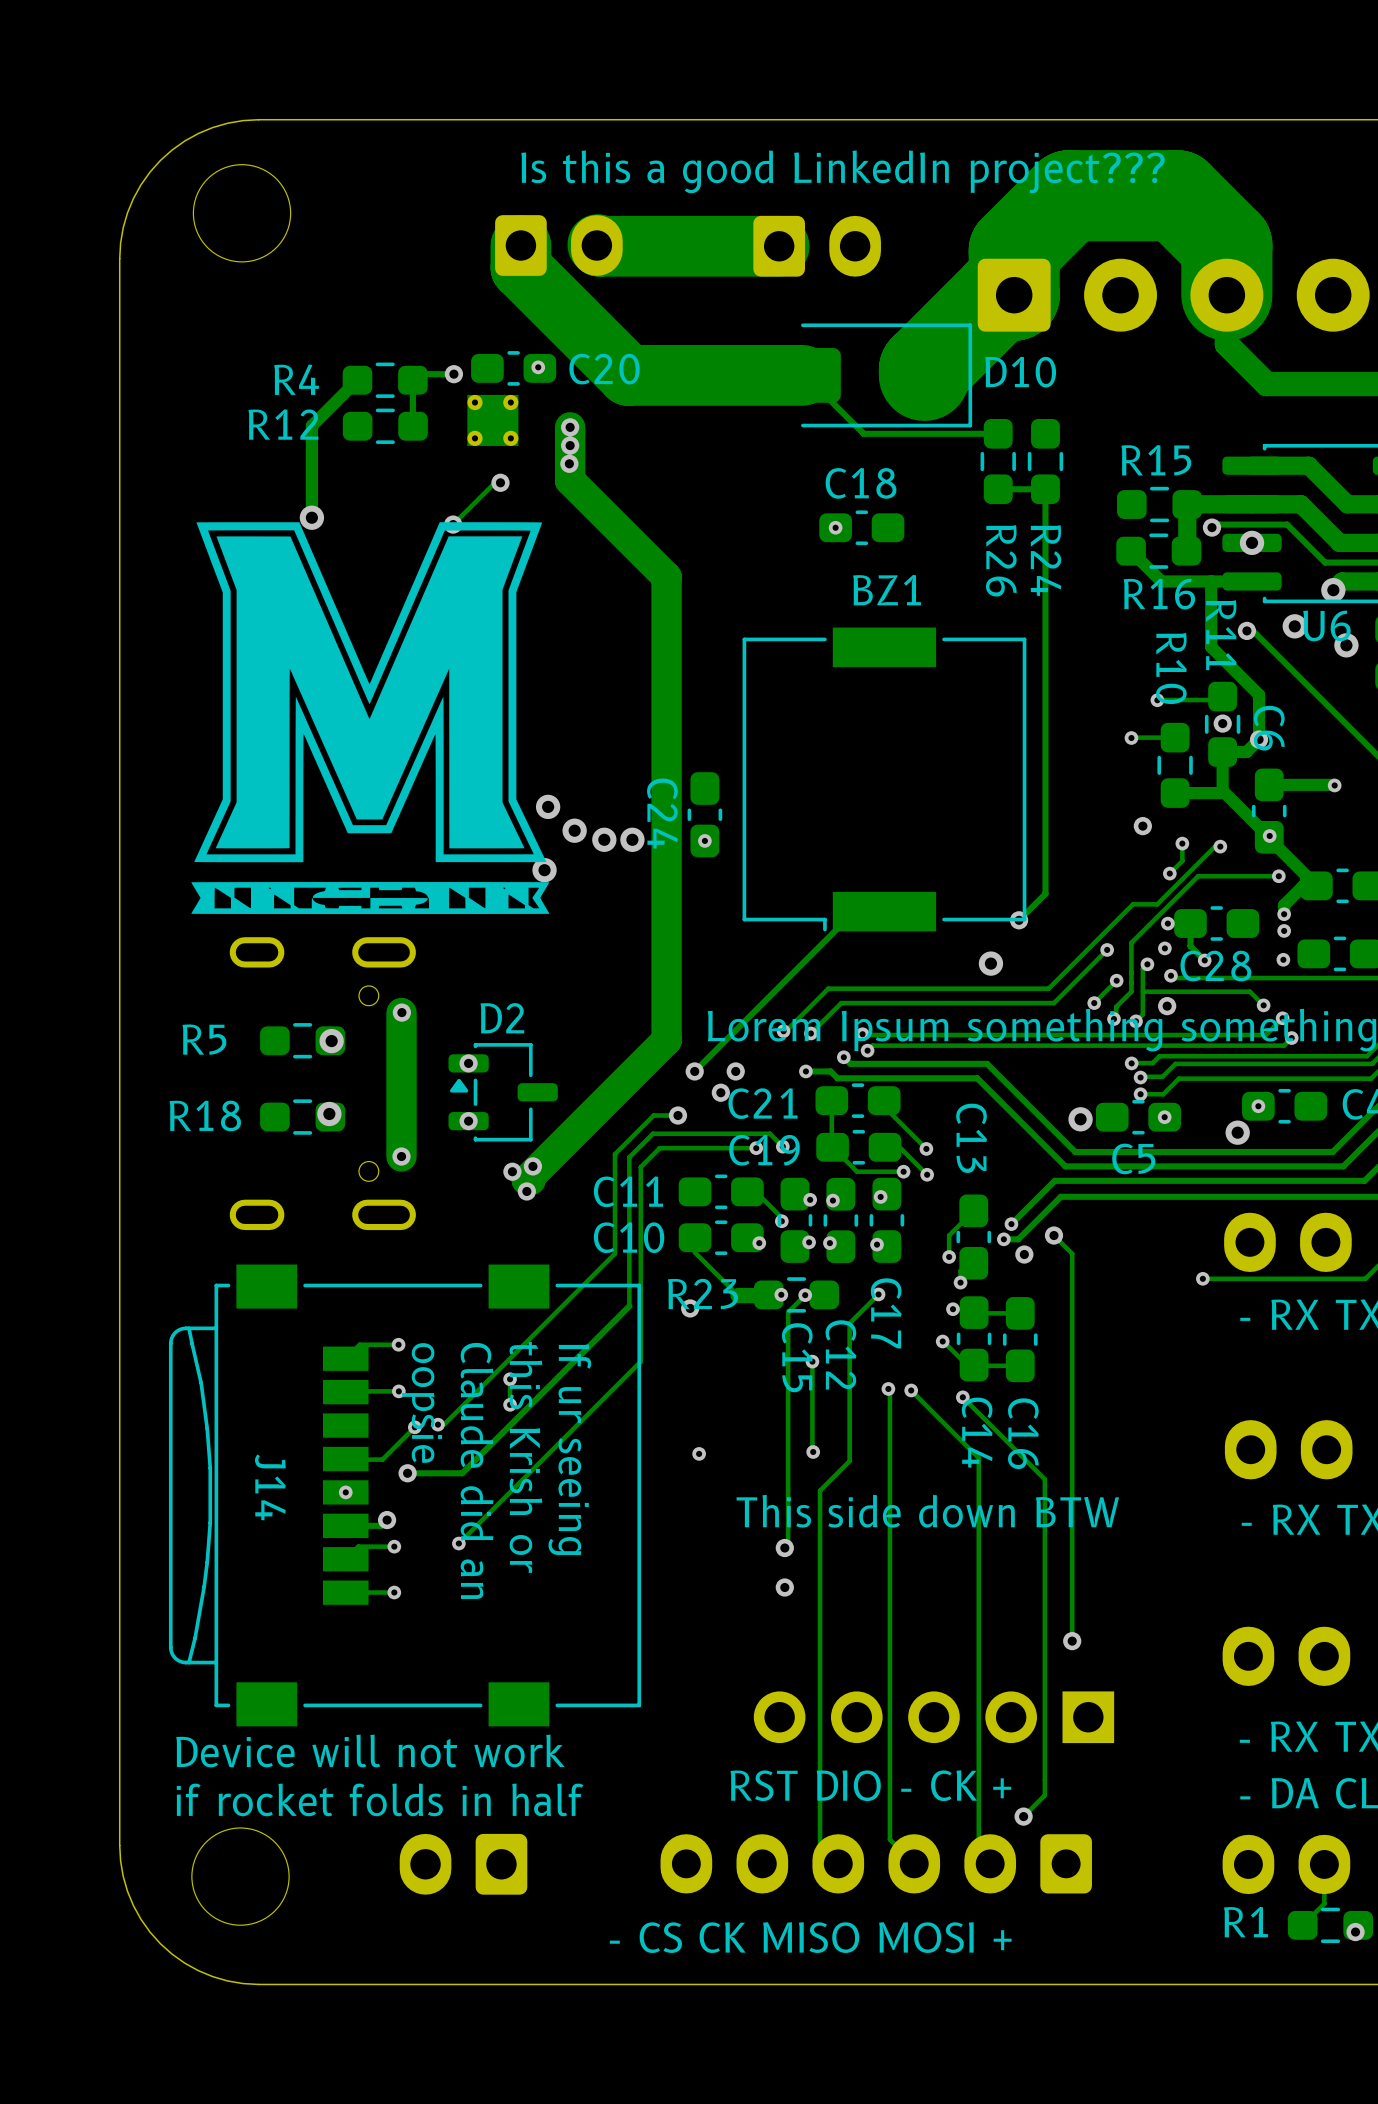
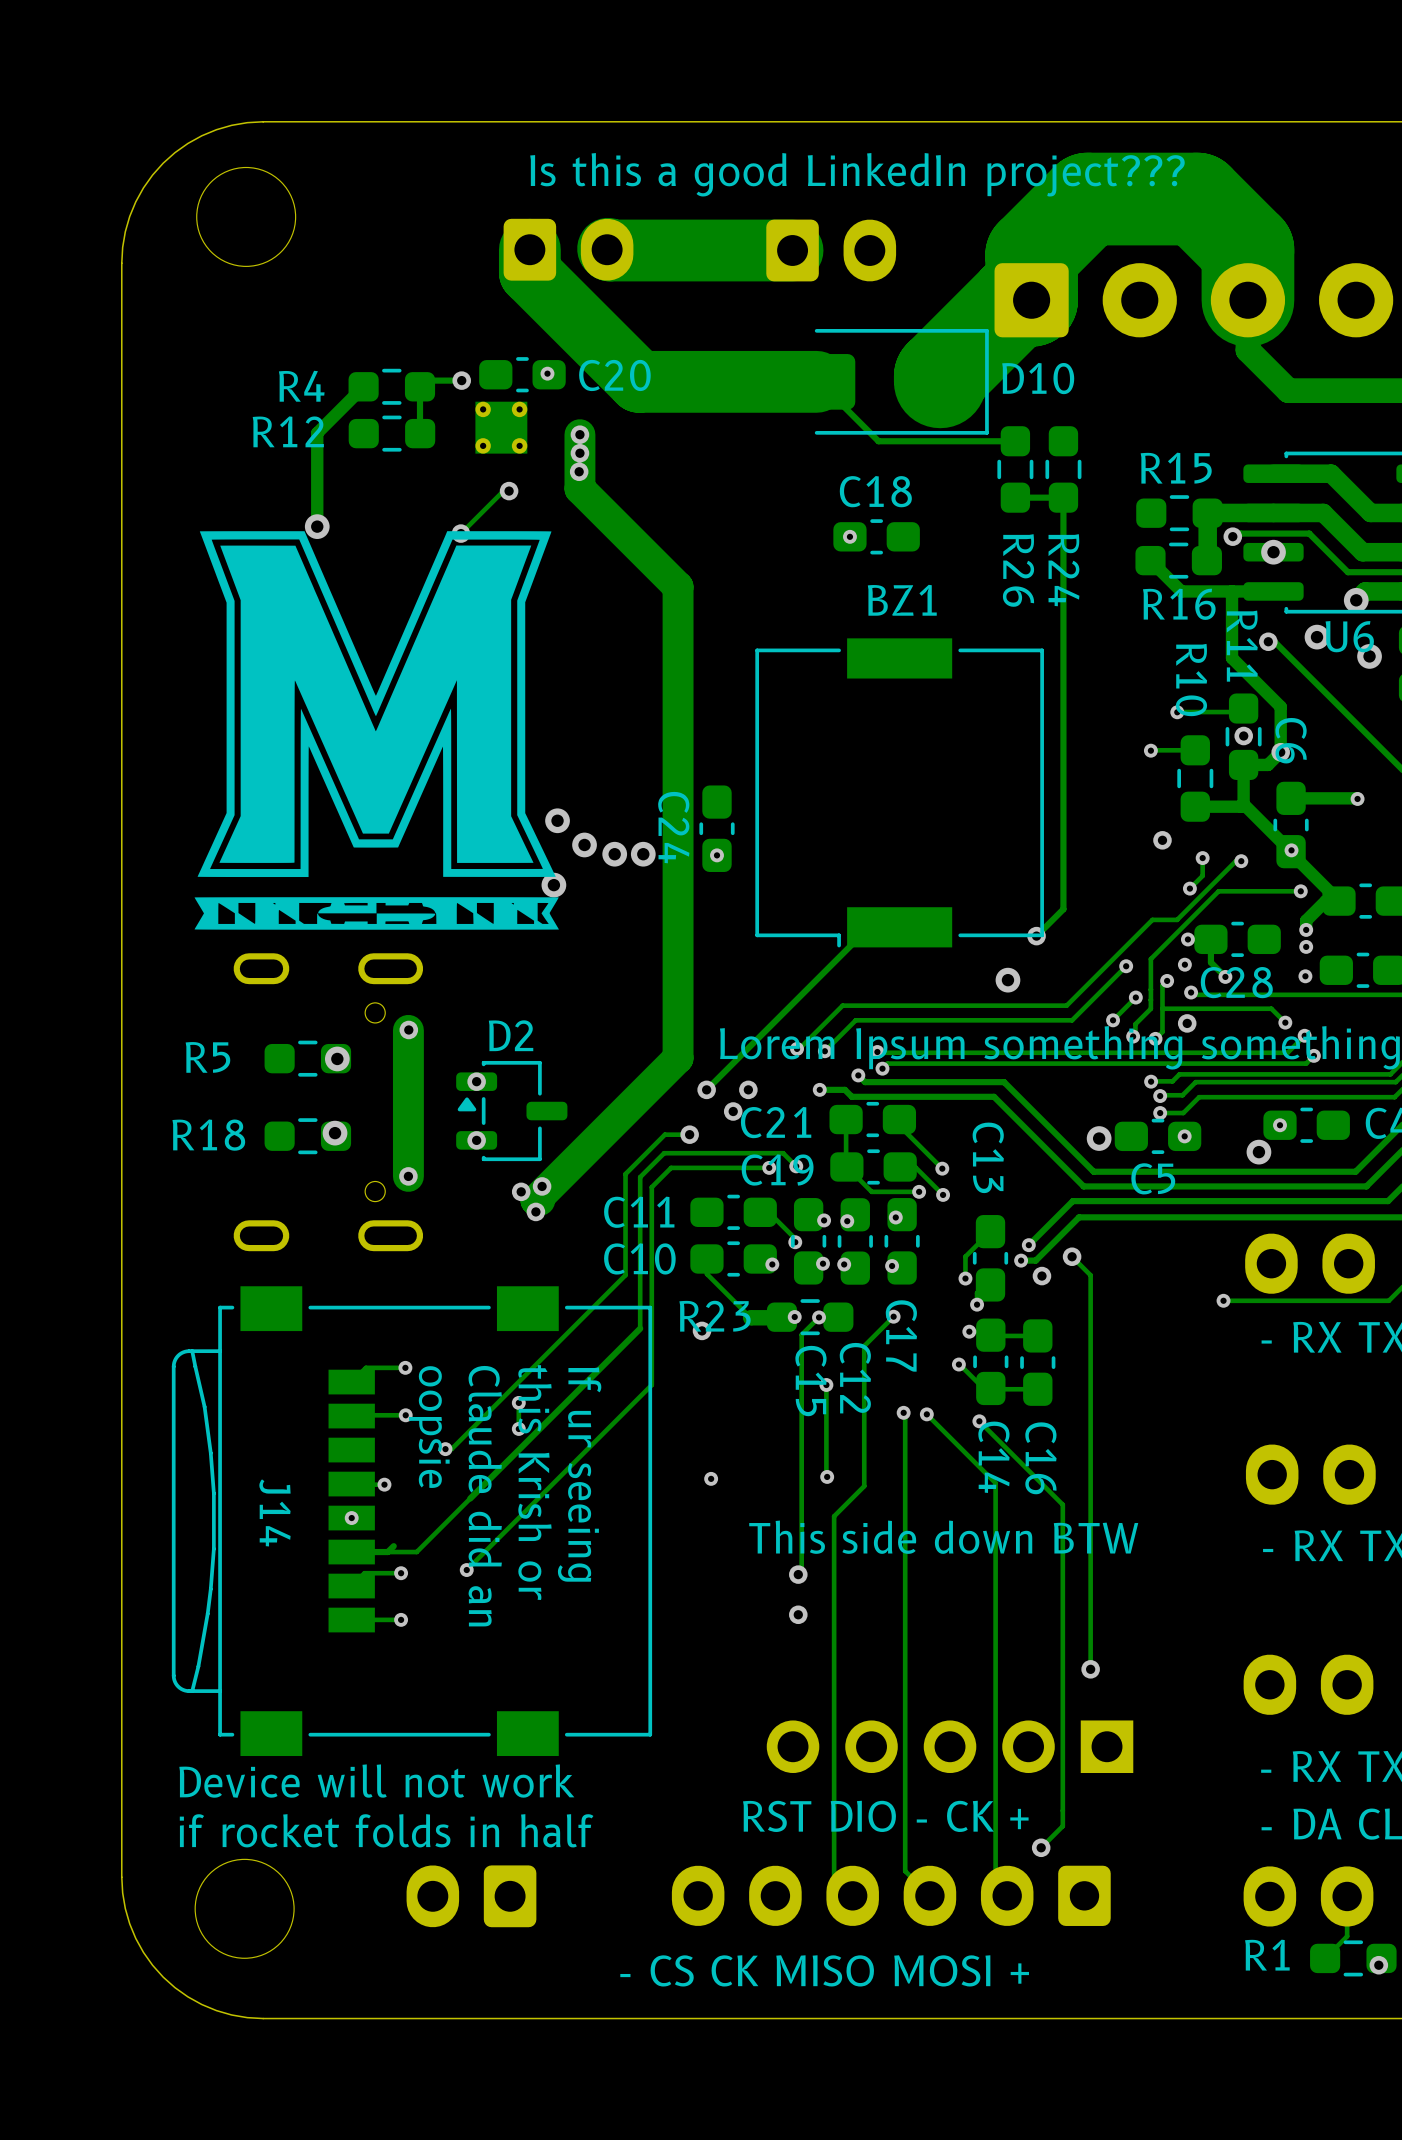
track: (414, 1427) (382, 1459) (377, 1459) -> none
via position: (414, 1427) -> (384, 1484)
via: (407, 1473) -> none
track: (462, 1473) (407, 1473) -> (470, 1498) (416, 1552) (387, 1552)
via: (387, 1520) -> none

